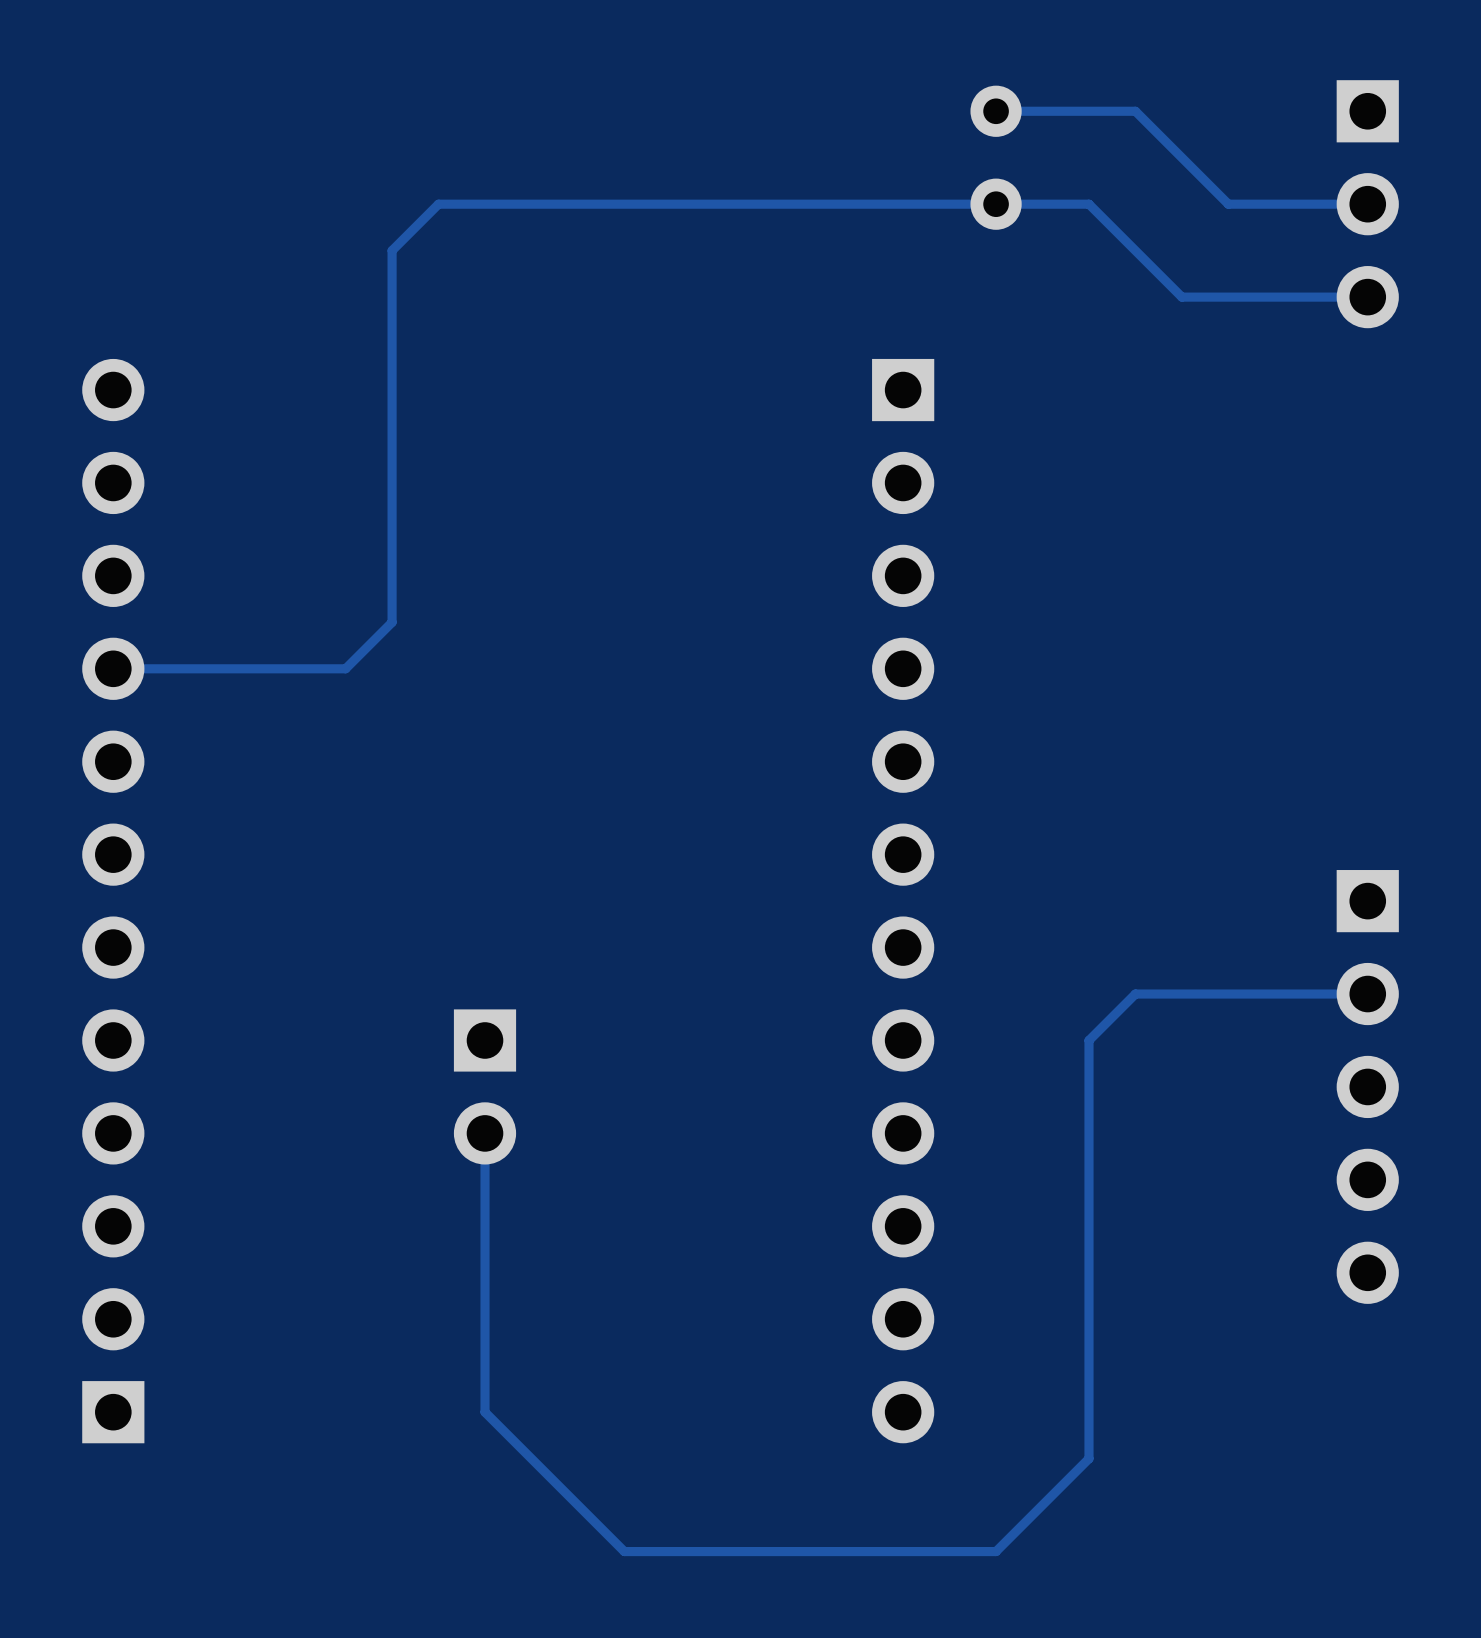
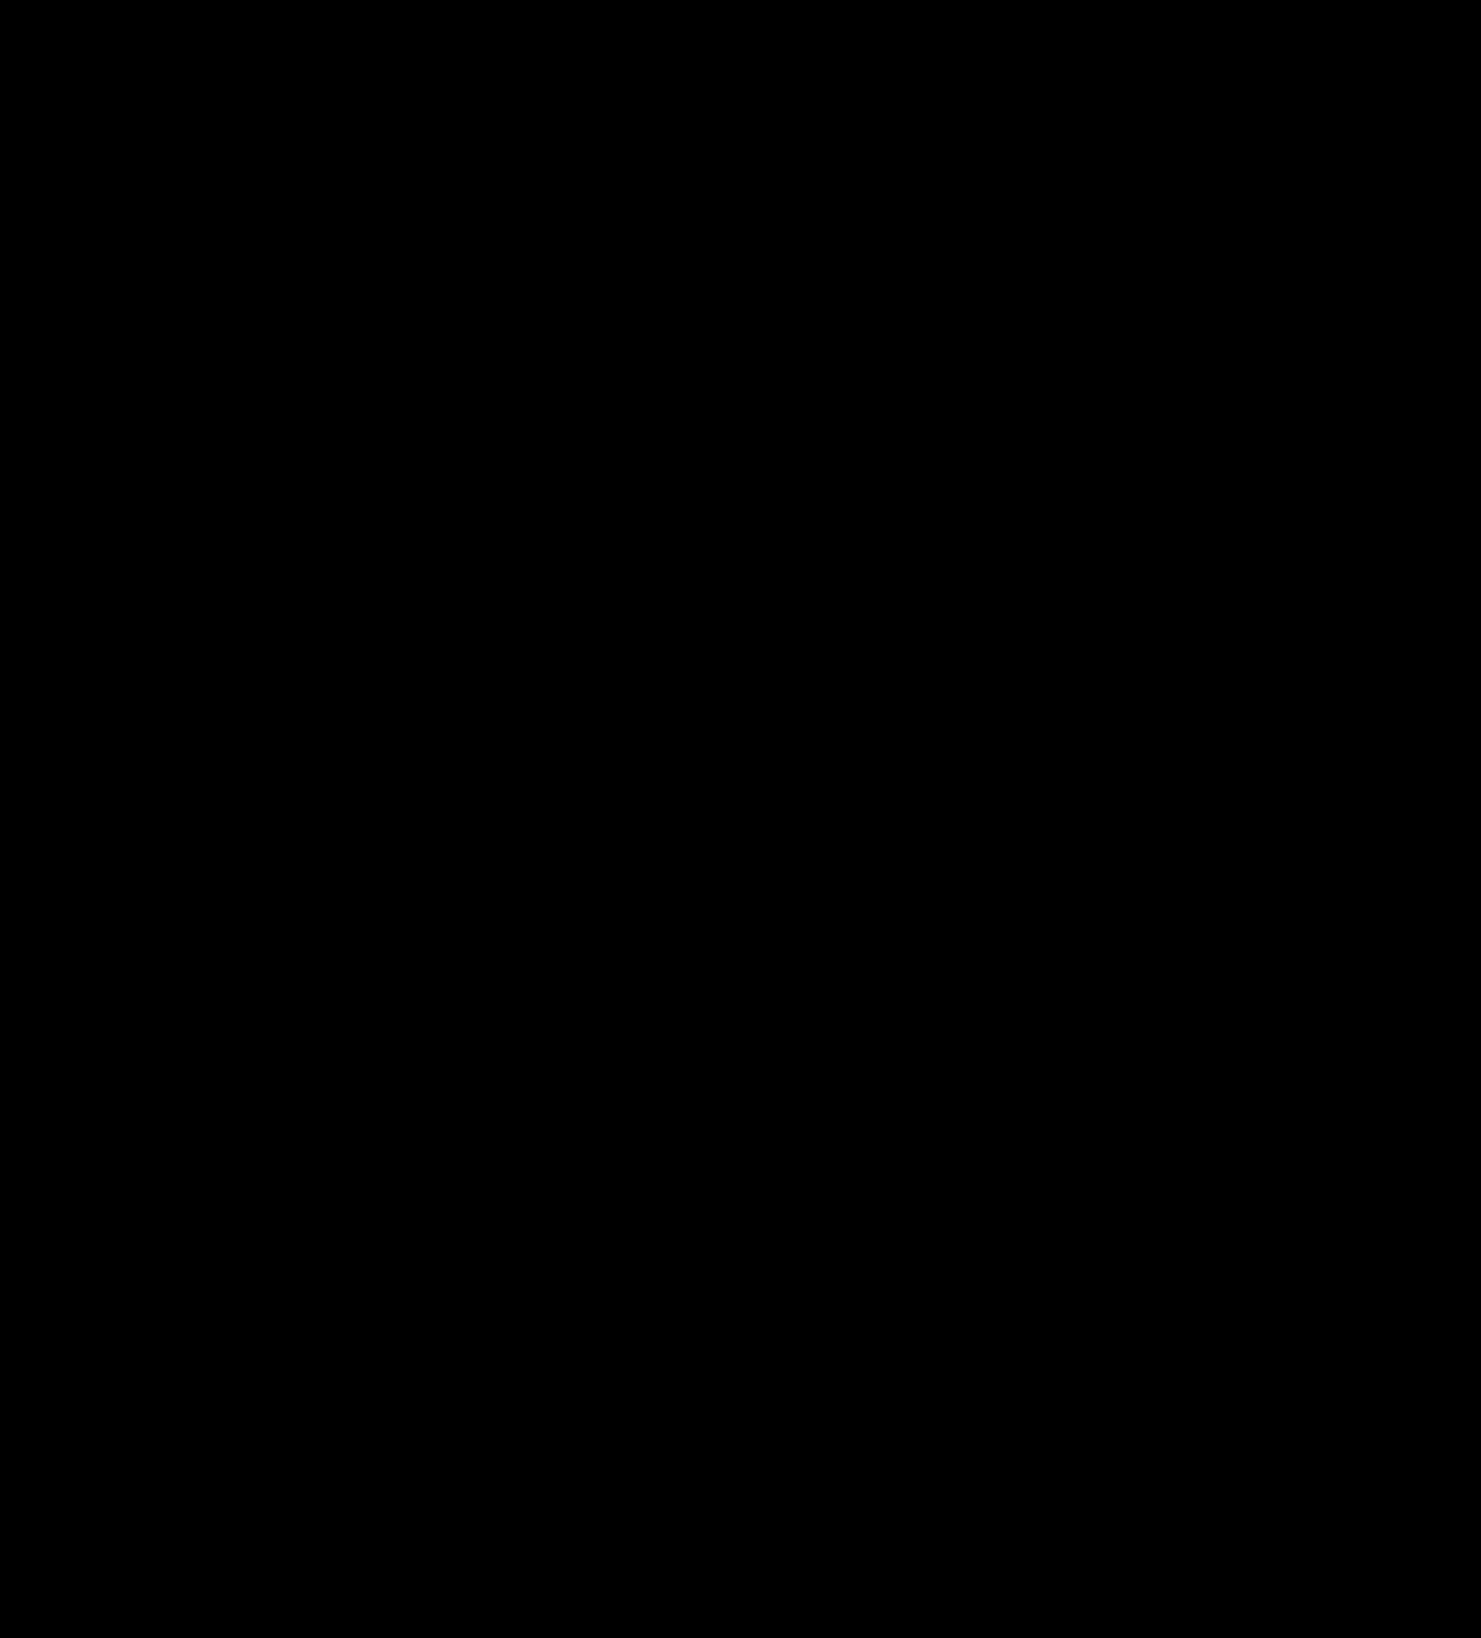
track: (996, 111) (1135, 111) (1228, 204) (1367, 204) -> none
part: (996, 157) -> none
part: (1367, 204) -> none
track: (1367, 297) (1181, 297) (1088, 204) (438, 204) (392, 250) (392, 622) (345, 668) (113, 668) -> none
part: (113, 901) -> none
part: (903, 901) -> none
track: (1367, 994) (1135, 994) (1088, 1040) (1088, 1458) (996, 1551) (624, 1551) (485, 1412) (485, 1133) -> none
part: (485, 1086) -> none
part: (1367, 1086) -> none

